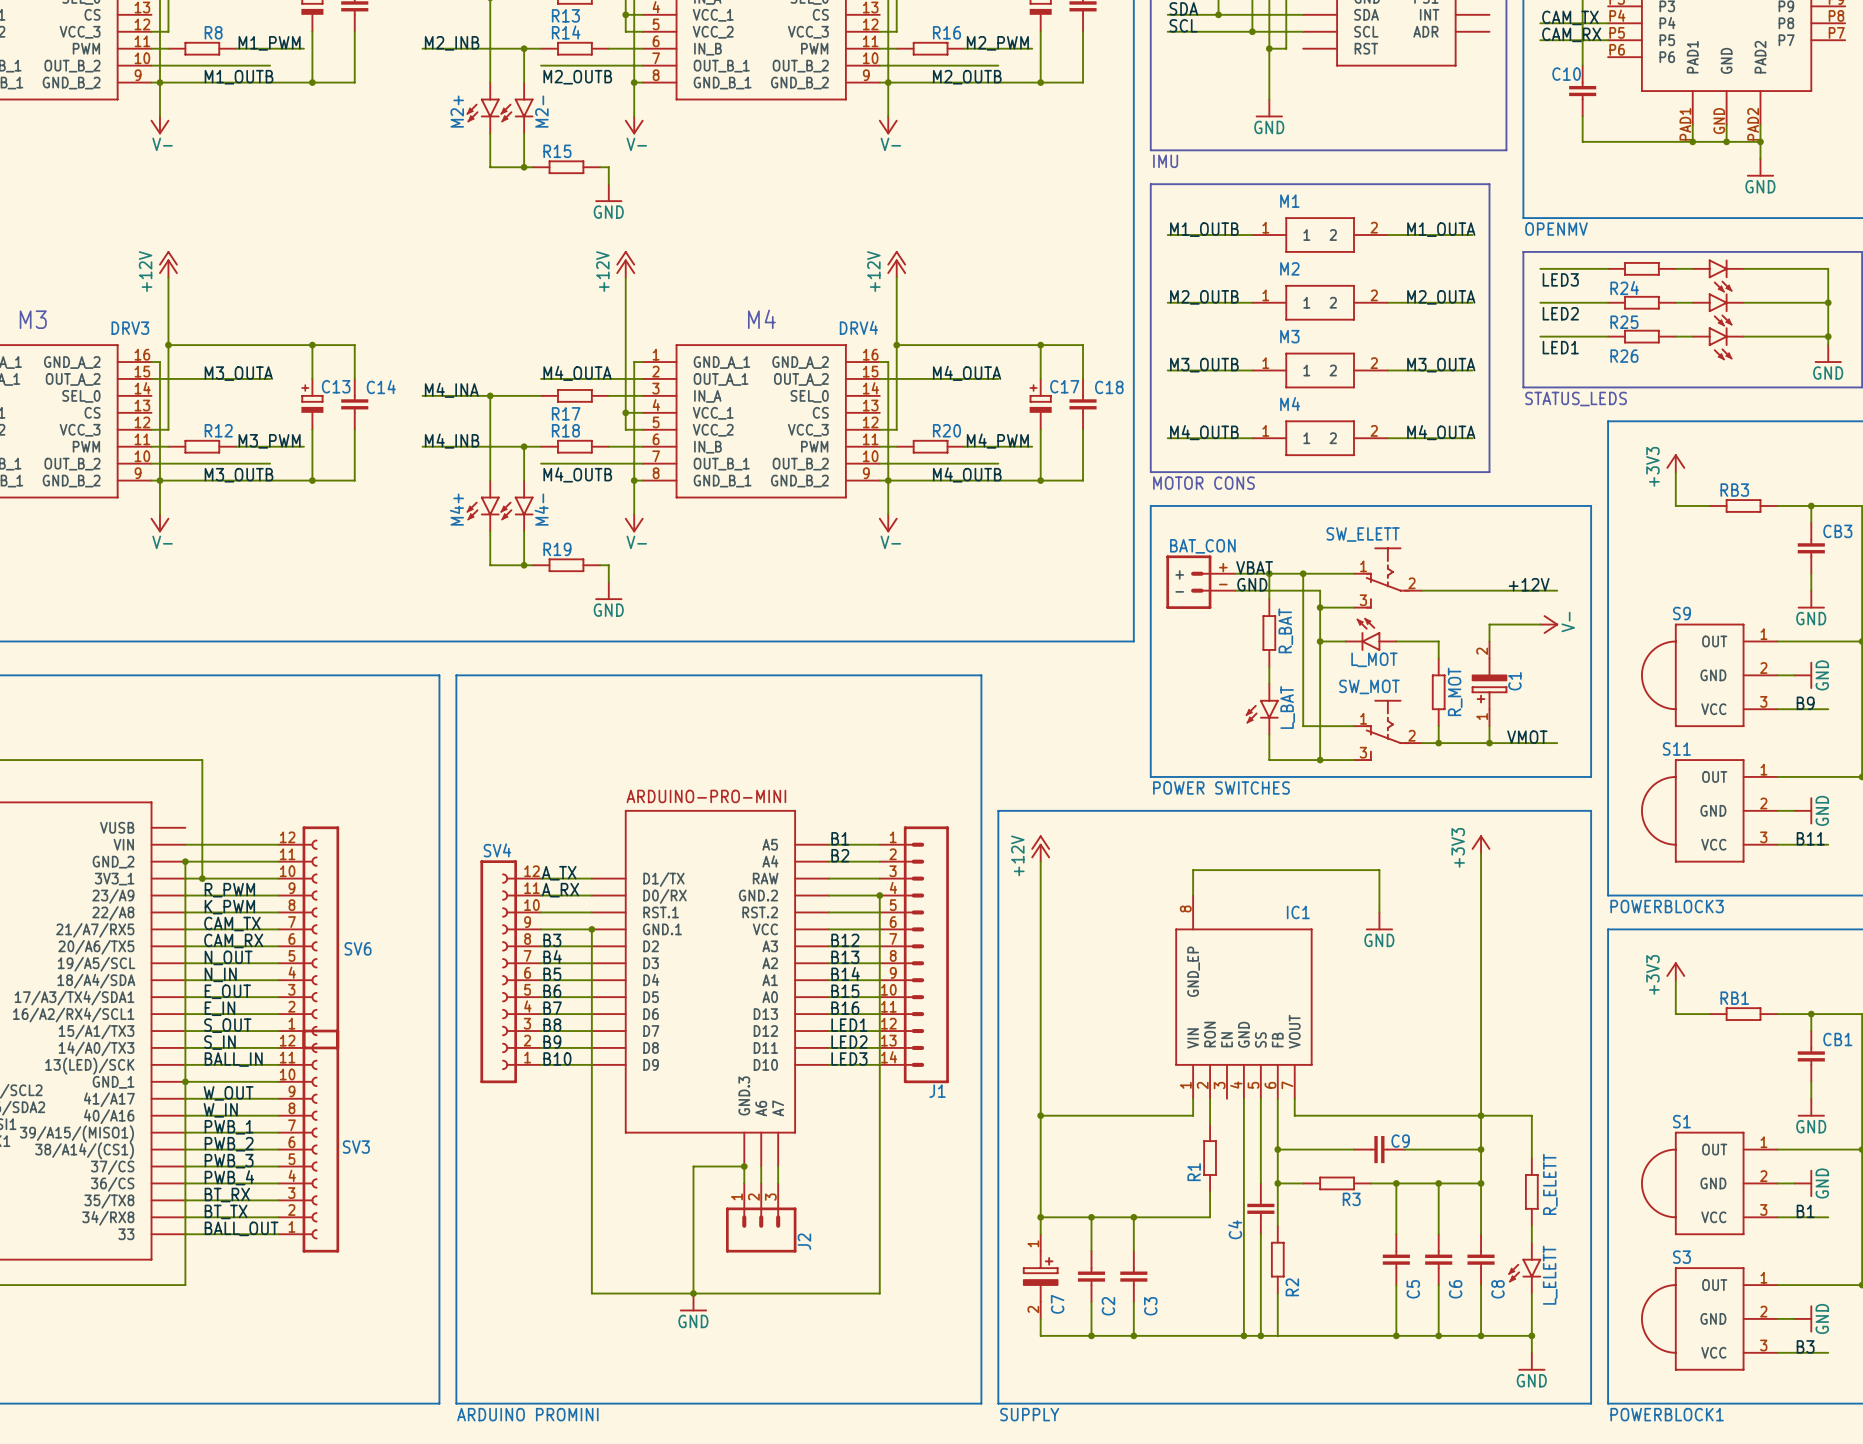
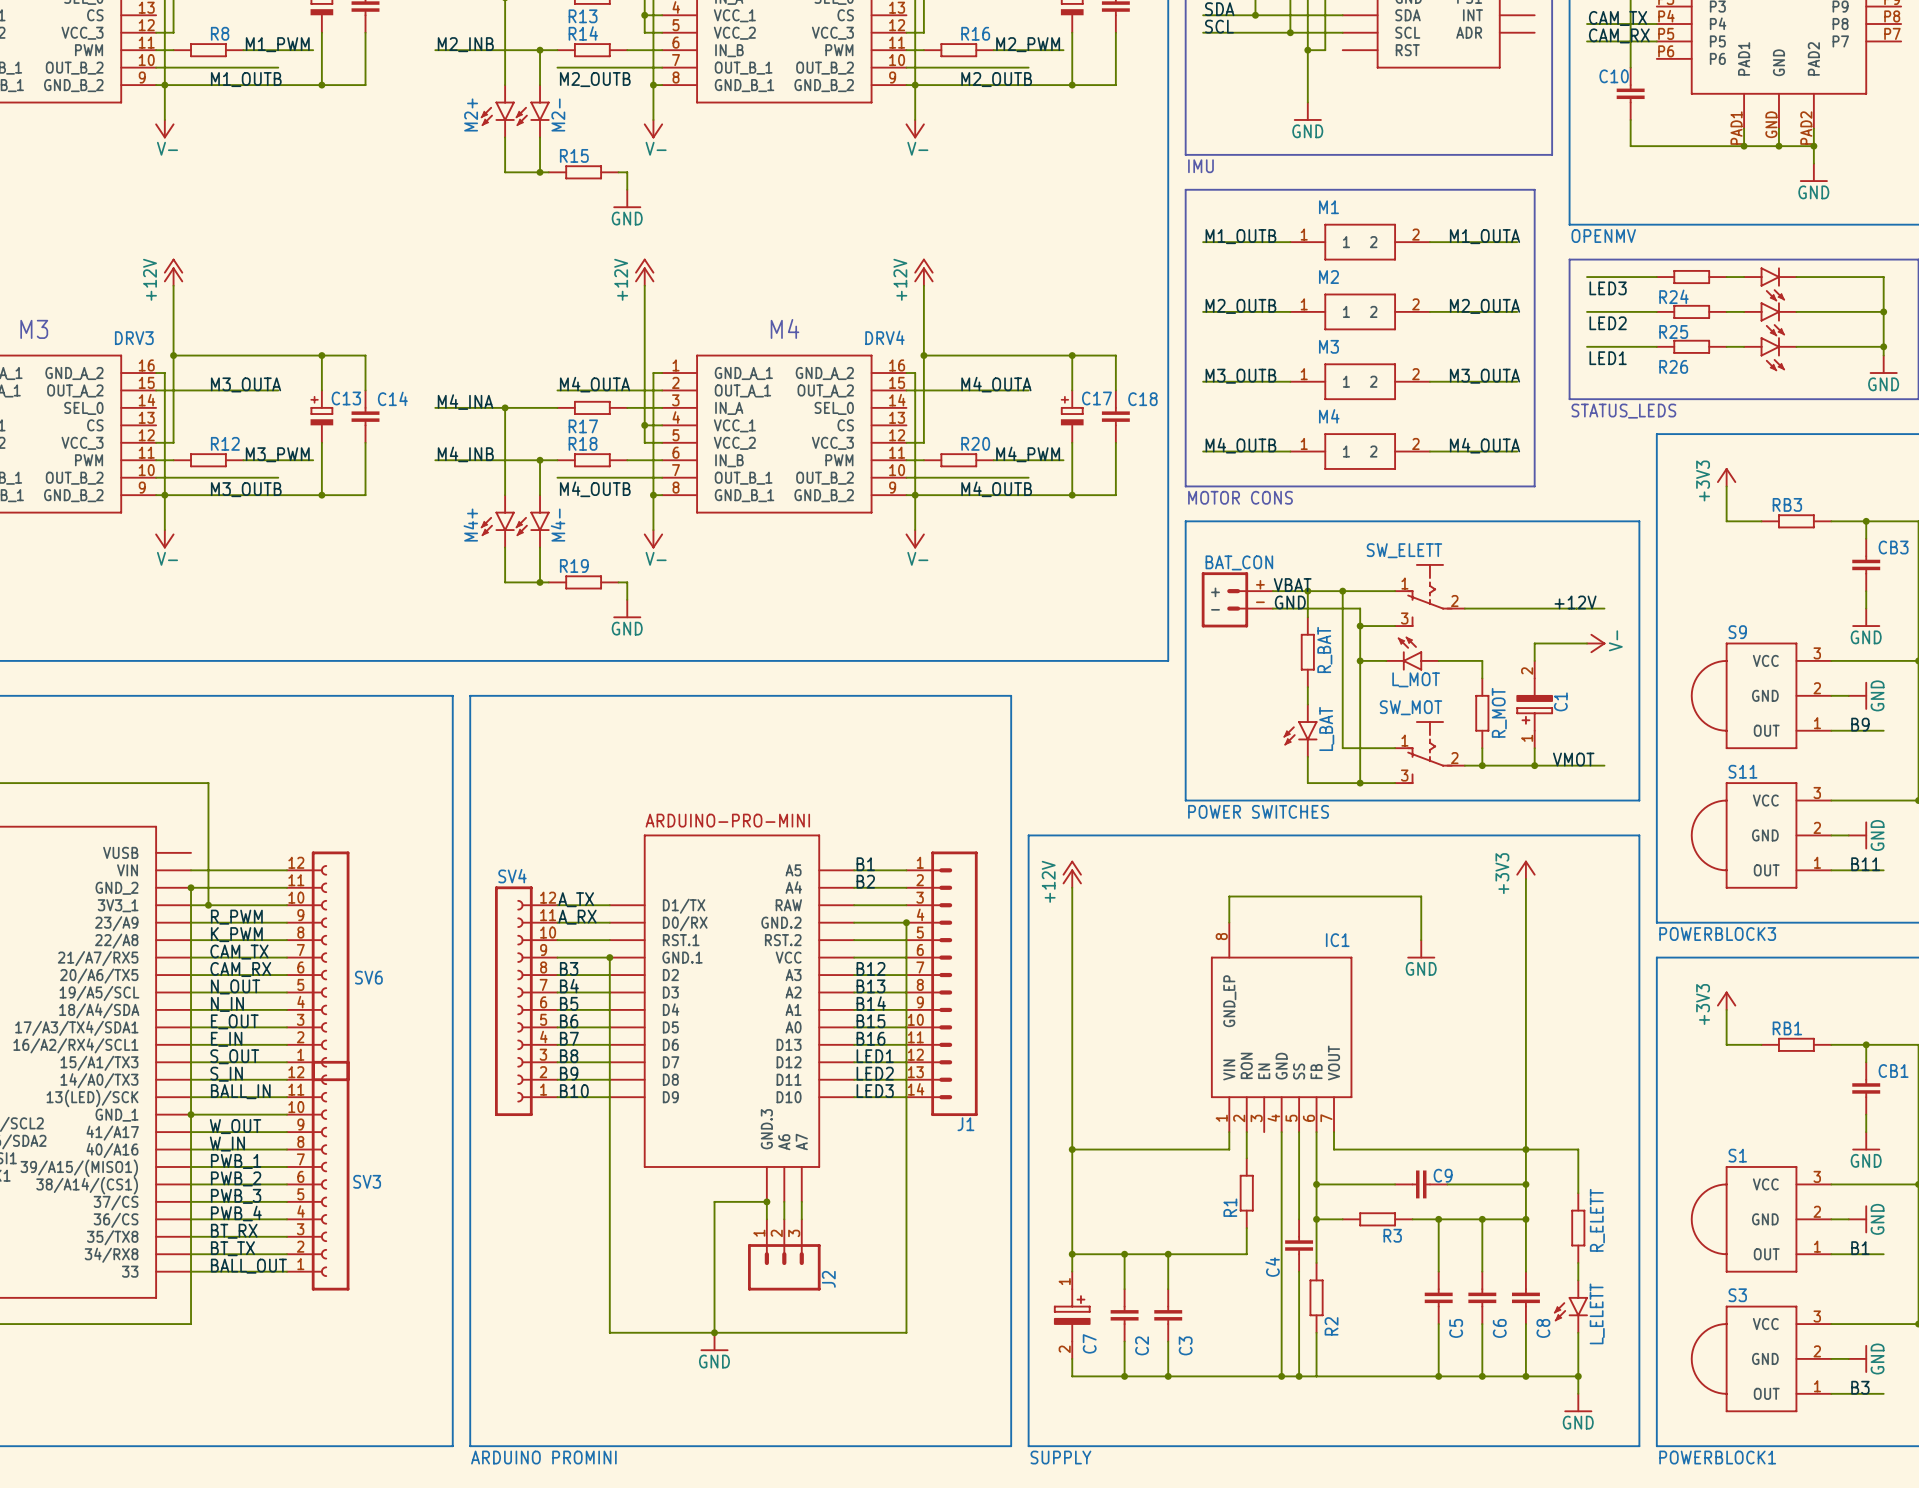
S9 flip: as is (1692, 675) -> up-down (1744, 695)
S11 name position: S11 (1676, 749) -> S11 (1742, 771)
S11 flip: as is (1692, 810) -> up-down (1744, 835)
S1 flip: as is (1692, 1183) -> up-down (1744, 1219)
S3 flip: as is (1692, 1318) -> up-down (1744, 1358)

